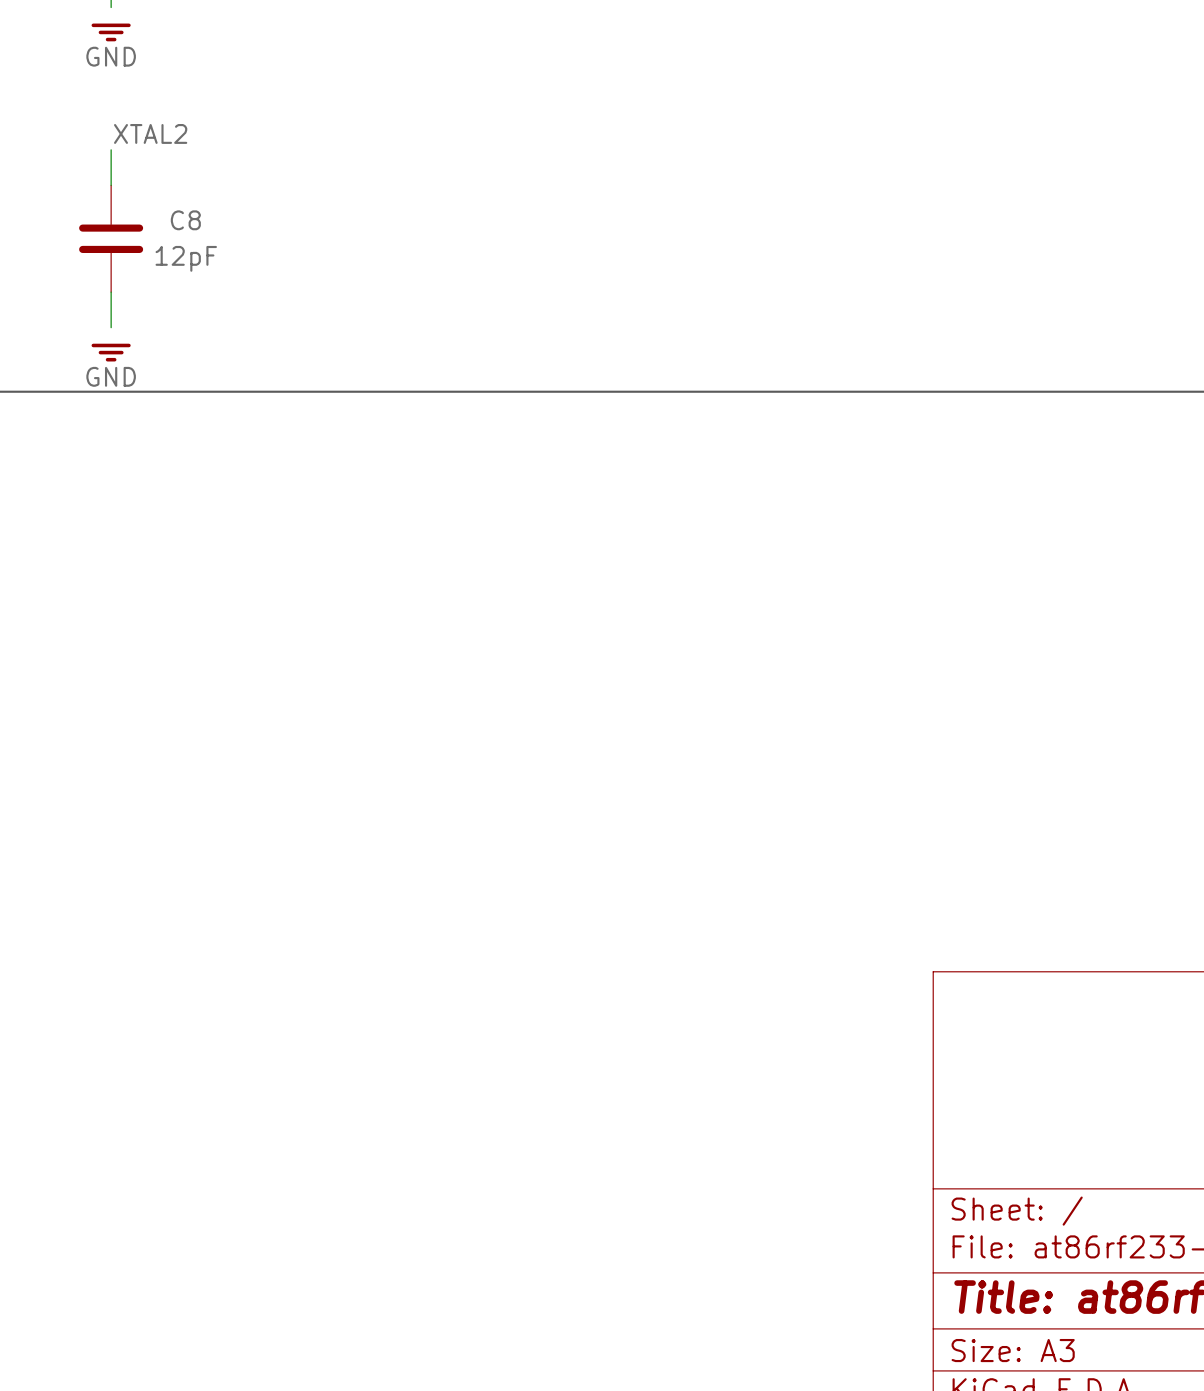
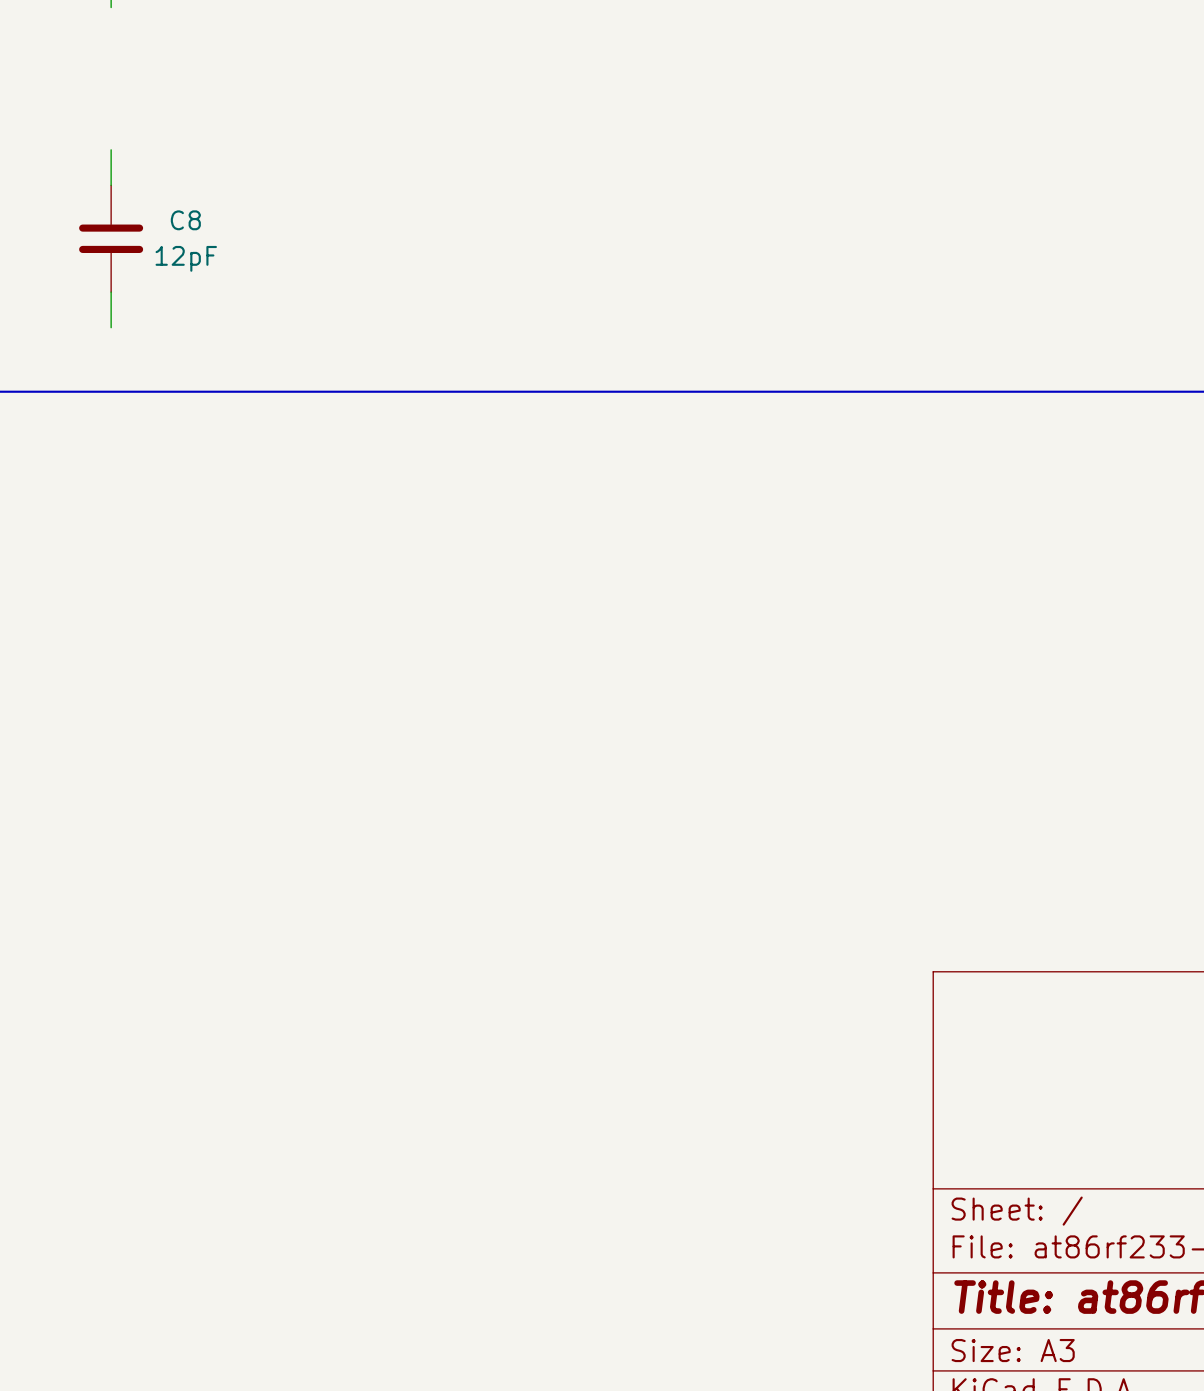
power symbol: GND (111, 32) -> none
label: XTAL2 (150, 133) -> none
power symbol: GND (111, 352) -> none

